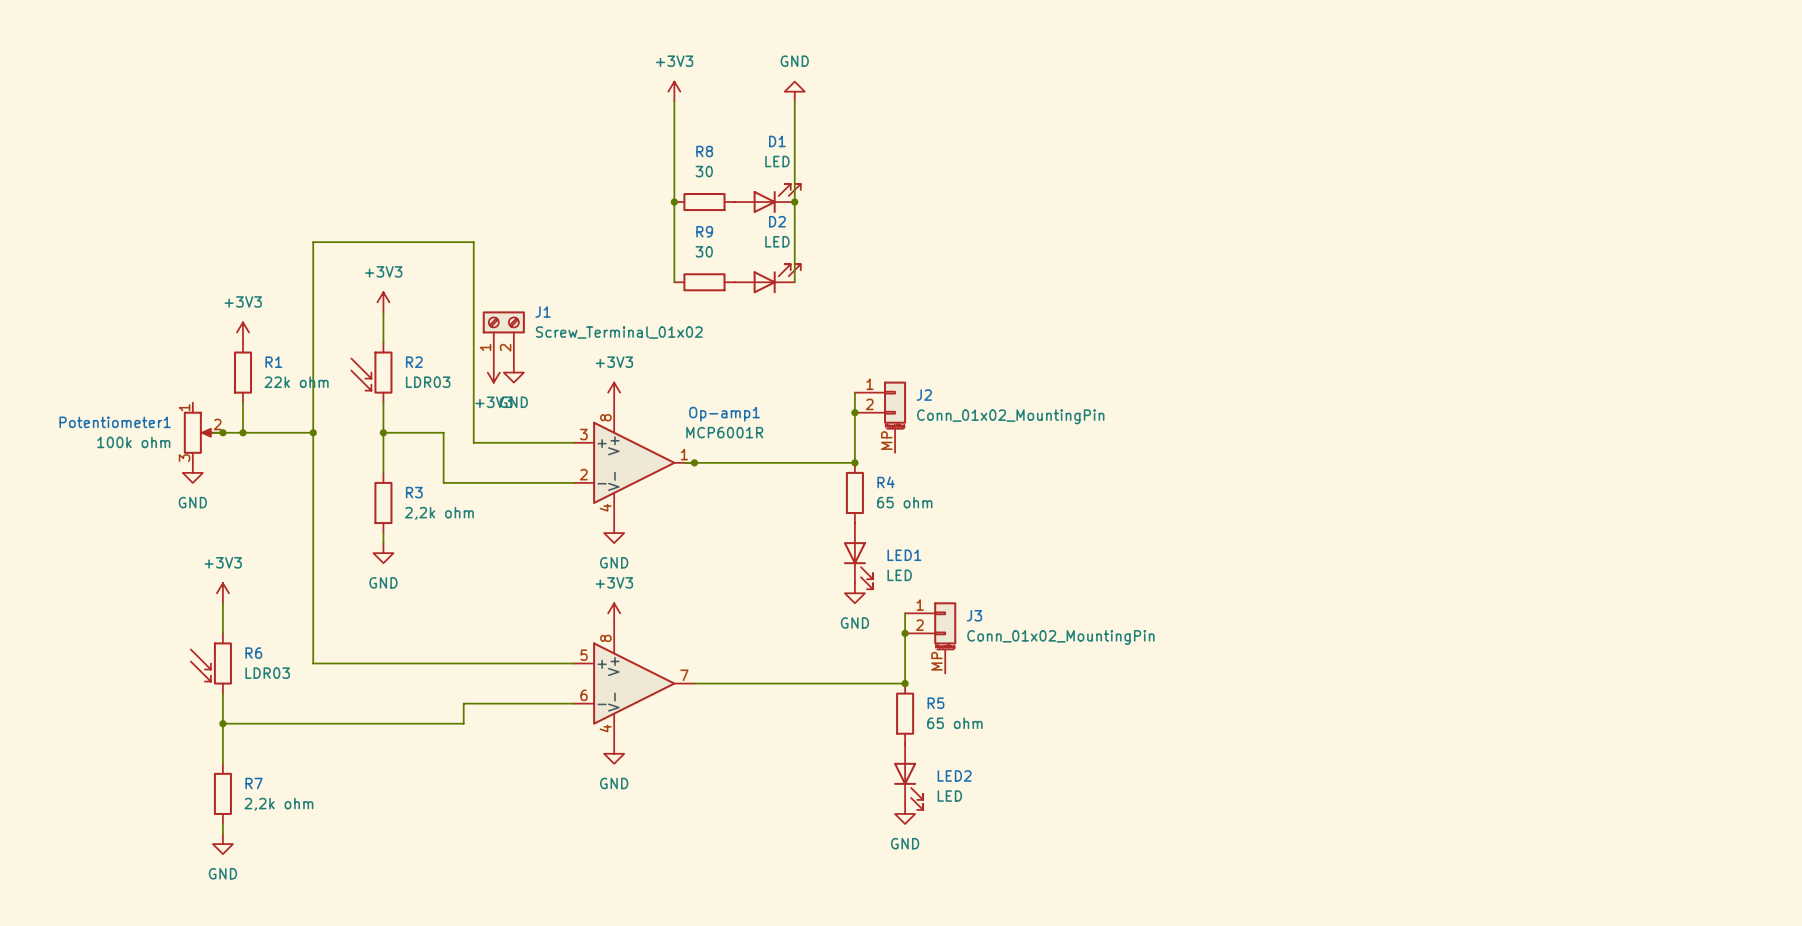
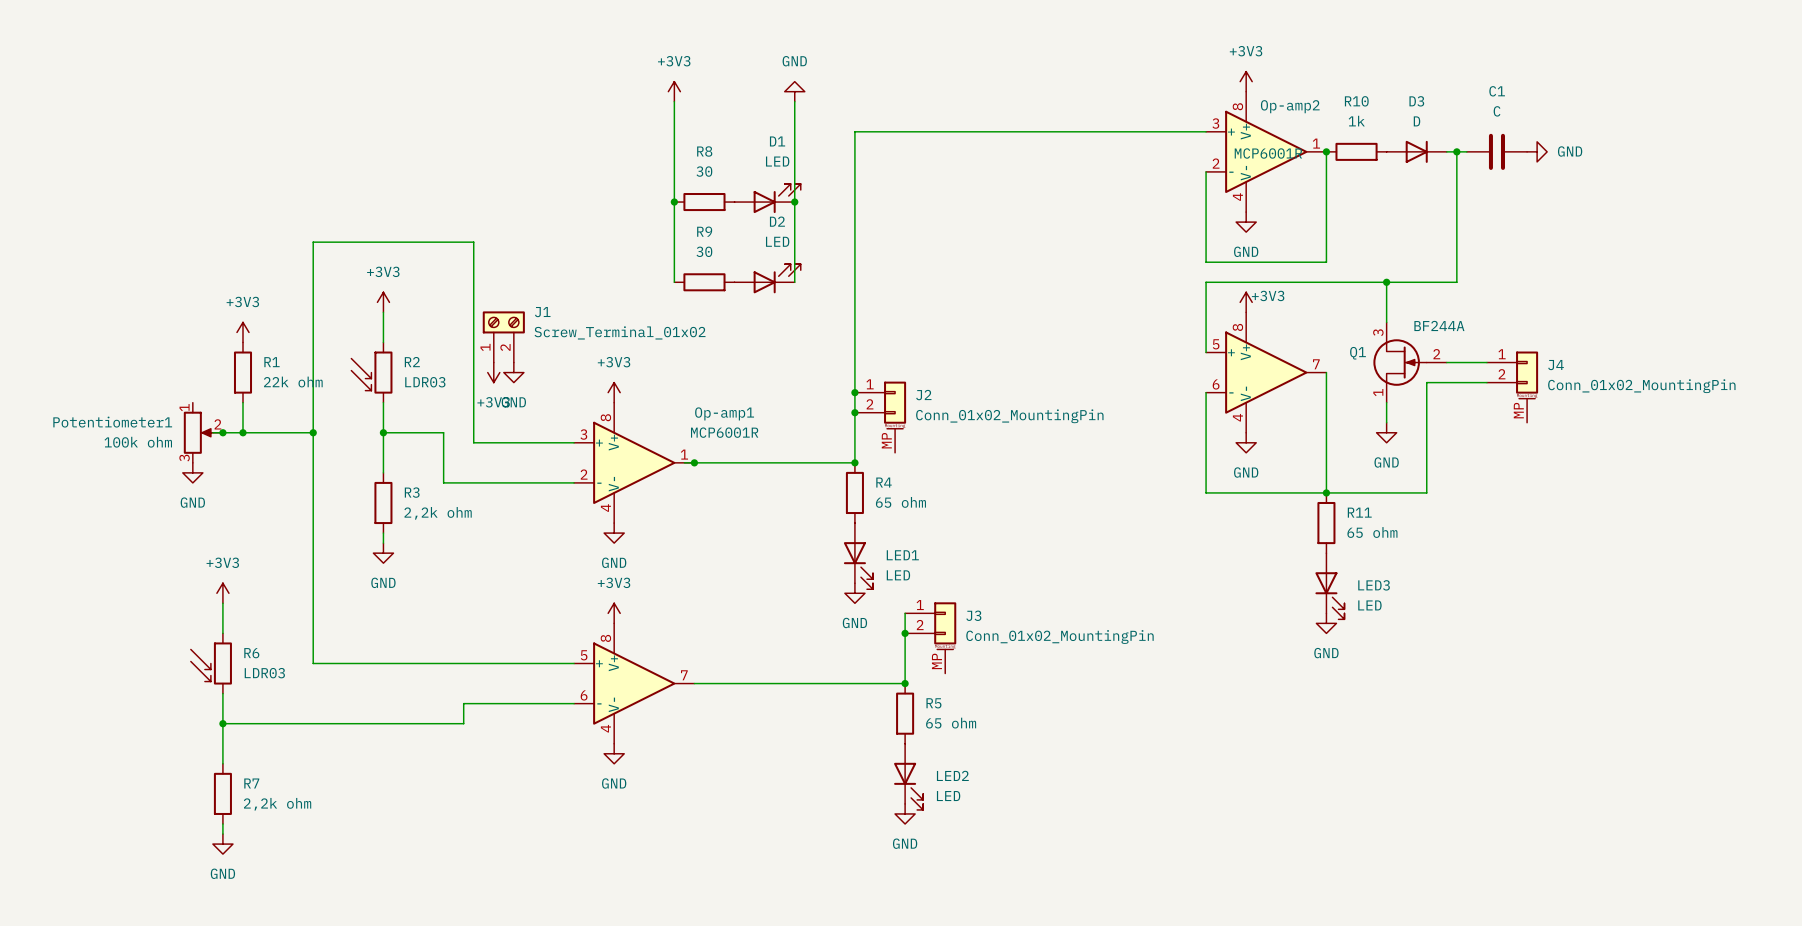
power symbol: none -> +3V3 (1246, 81)
wire: none -> (1206, 131) (854, 131) (854, 392)
wire: none -> (1326, 151) (1326, 262) (1206, 262) (1206, 171)
junction: none -> (1326, 151)
R10: none -> 1k (1356, 151)
D3: none -> D (1416, 151)
wire: none -> (1446, 151) (1466, 151)
wire: none -> (1456, 151) (1456, 282) (1206, 282) (1206, 352)
junction: none -> (1456, 151)
C1: none -> C (1496, 151)
power symbol: none -> GND (1537, 151)
power symbol: none -> GND (1246, 222)
Op-amp2: none -> MCP6001R (1266, 262)
wire: none -> (1386, 282) (1386, 322)
junction: none -> (1386, 282)
power symbol: none -> +3V3 (1246, 302)
Q1: none -> BF244A (1410, 362)
wire: none -> (1446, 362) (1486, 362)
wire: none -> (1326, 372) (1326, 492)
wire: none -> (1486, 382) (1426, 382) (1426, 492) (1206, 492) (1206, 392)
J4: none -> Conn_01x02_MountingPin (1512, 387)
junction: none -> (854, 392)
wire: none -> (1386, 402) (1386, 422)
power symbol: none -> GND (1386, 432)
power symbol: none -> GND (1246, 442)
junction: none -> (1326, 492)
R11: none -> 65 ohm (1326, 523)
LED3: none -> LED (1329, 586)
power symbol: none -> GND (1326, 623)

